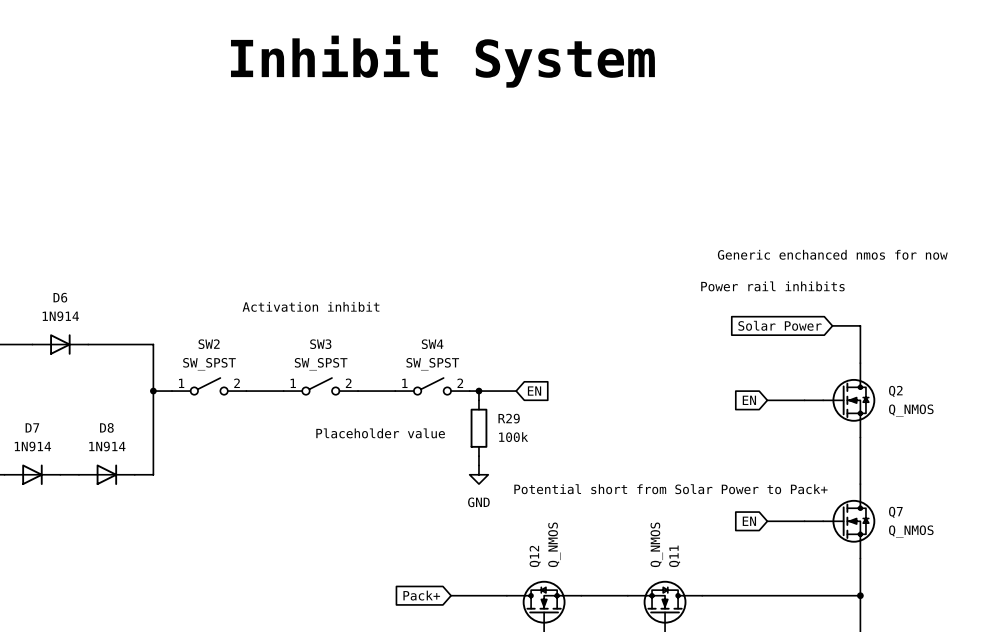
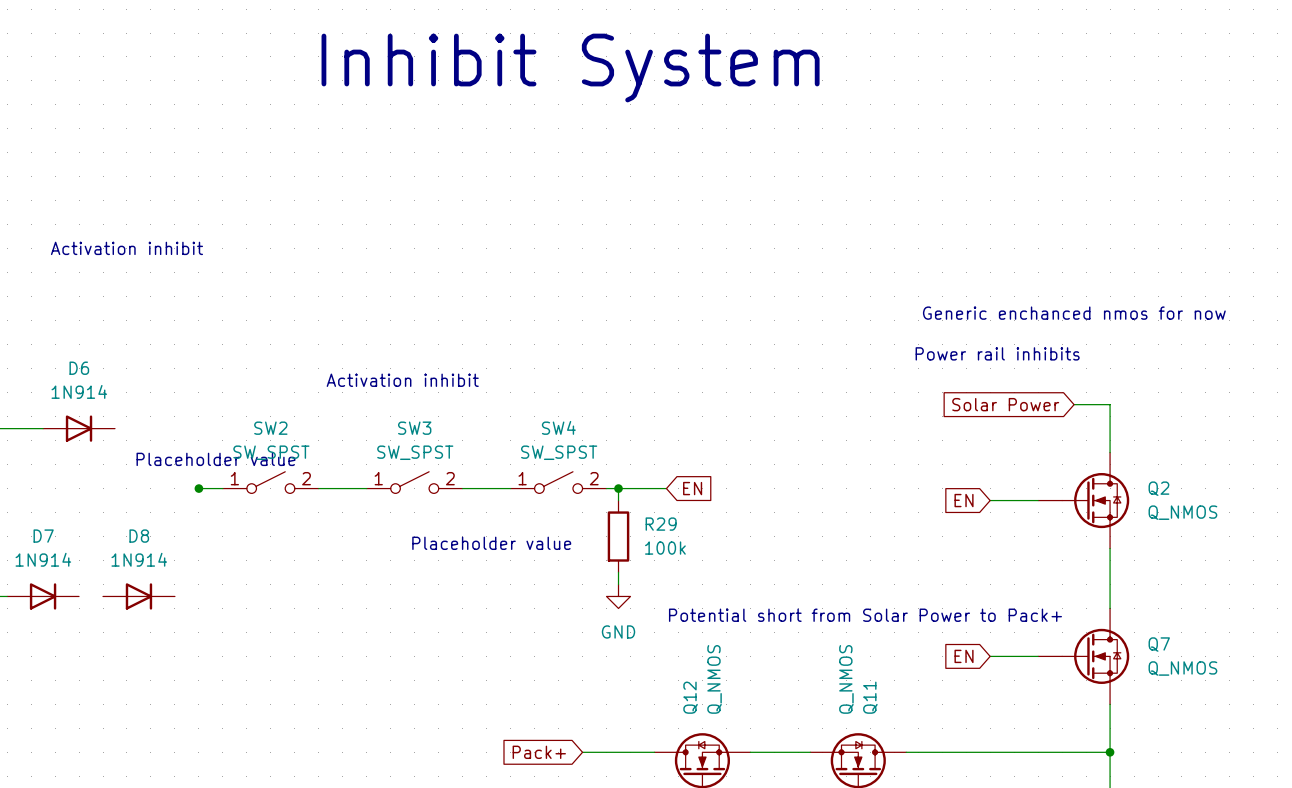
text: none -> Activation inhibit (126, 248)
wire: (88, 344) (153, 344) (153, 474) (134, 474) -> none
text: none -> Placeholder value (215, 459)
wire: (60, 474) (78, 474) -> none

